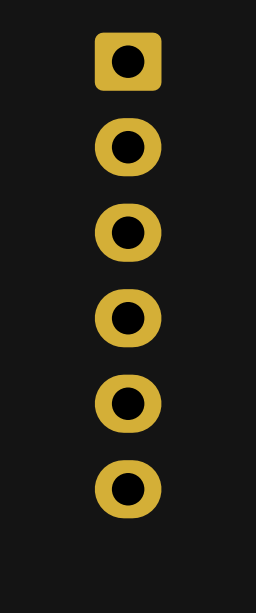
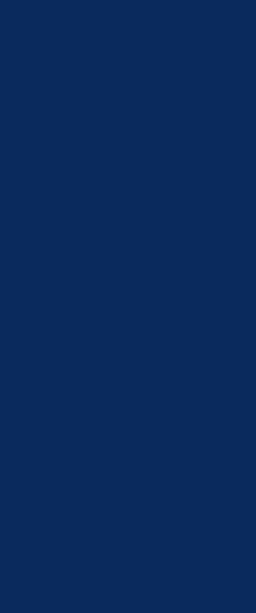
part: (128, 275) -> none

